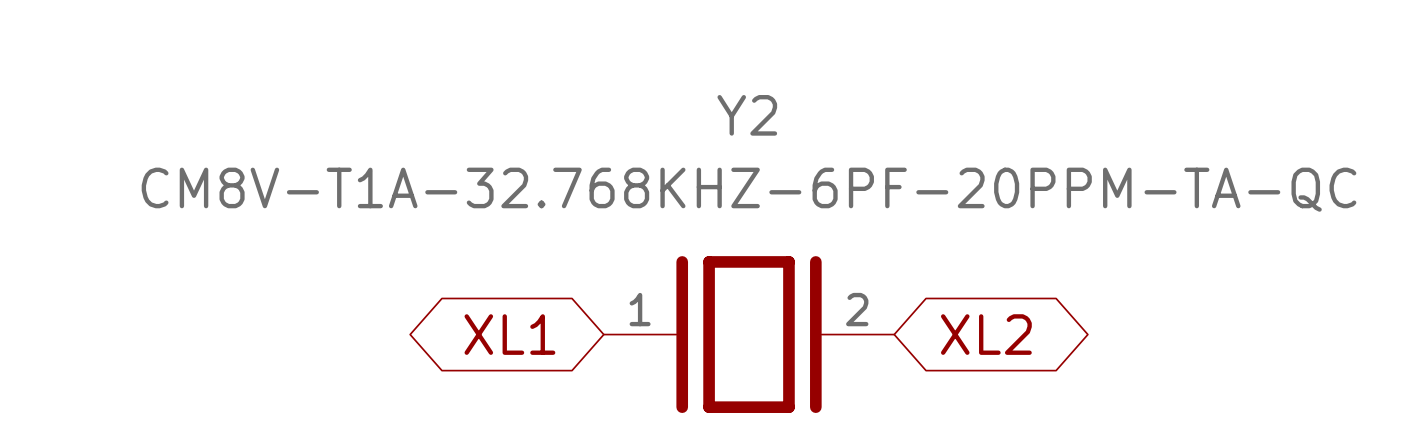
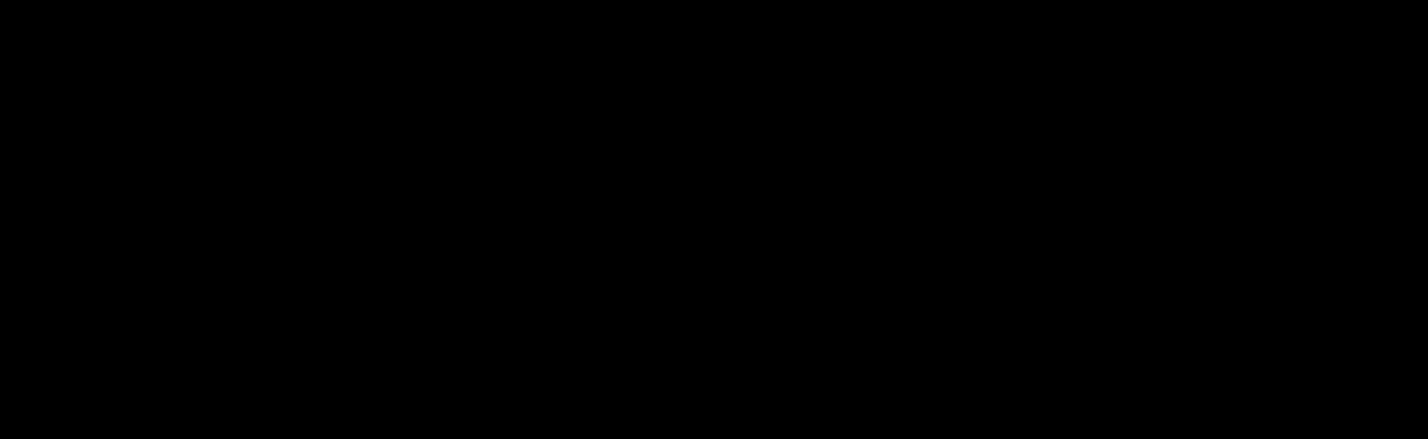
global label: XL1 (509, 334) -> none
Y2: CM8V-T1A-32.768KHZ-6PF-20PPM-TA-QC (749, 334) -> none
global label: XL2 (986, 334) -> none

